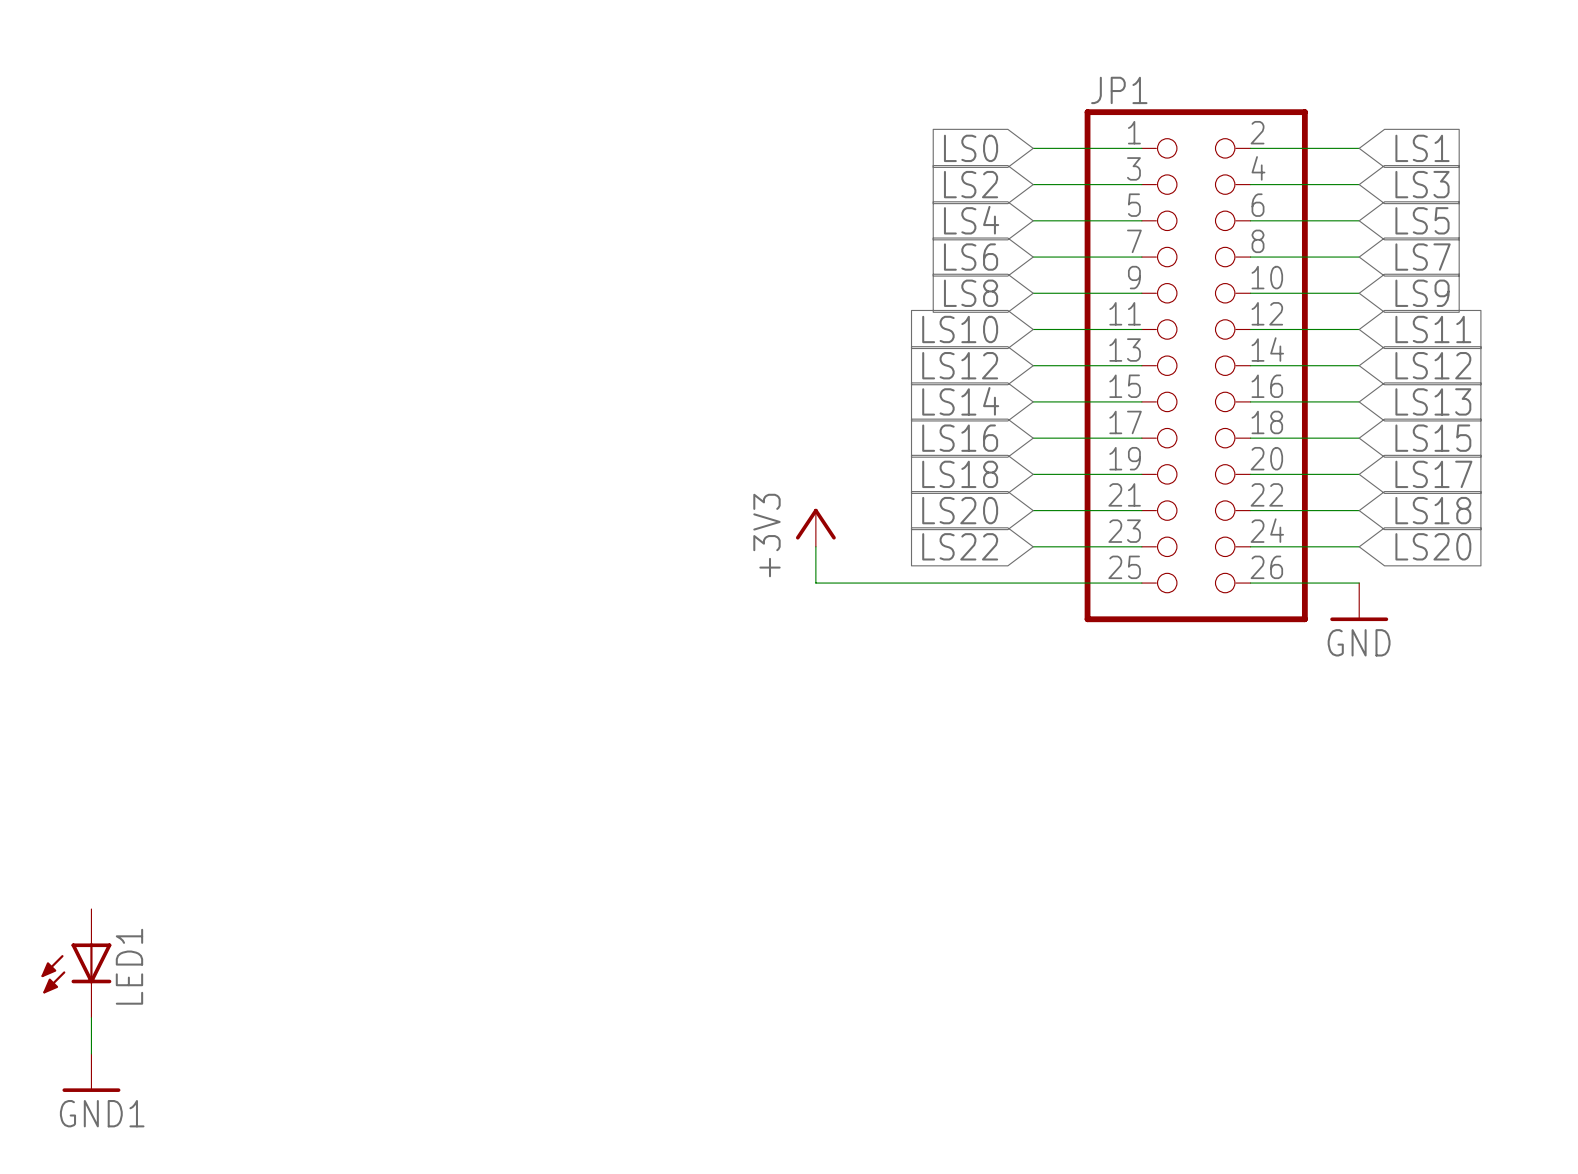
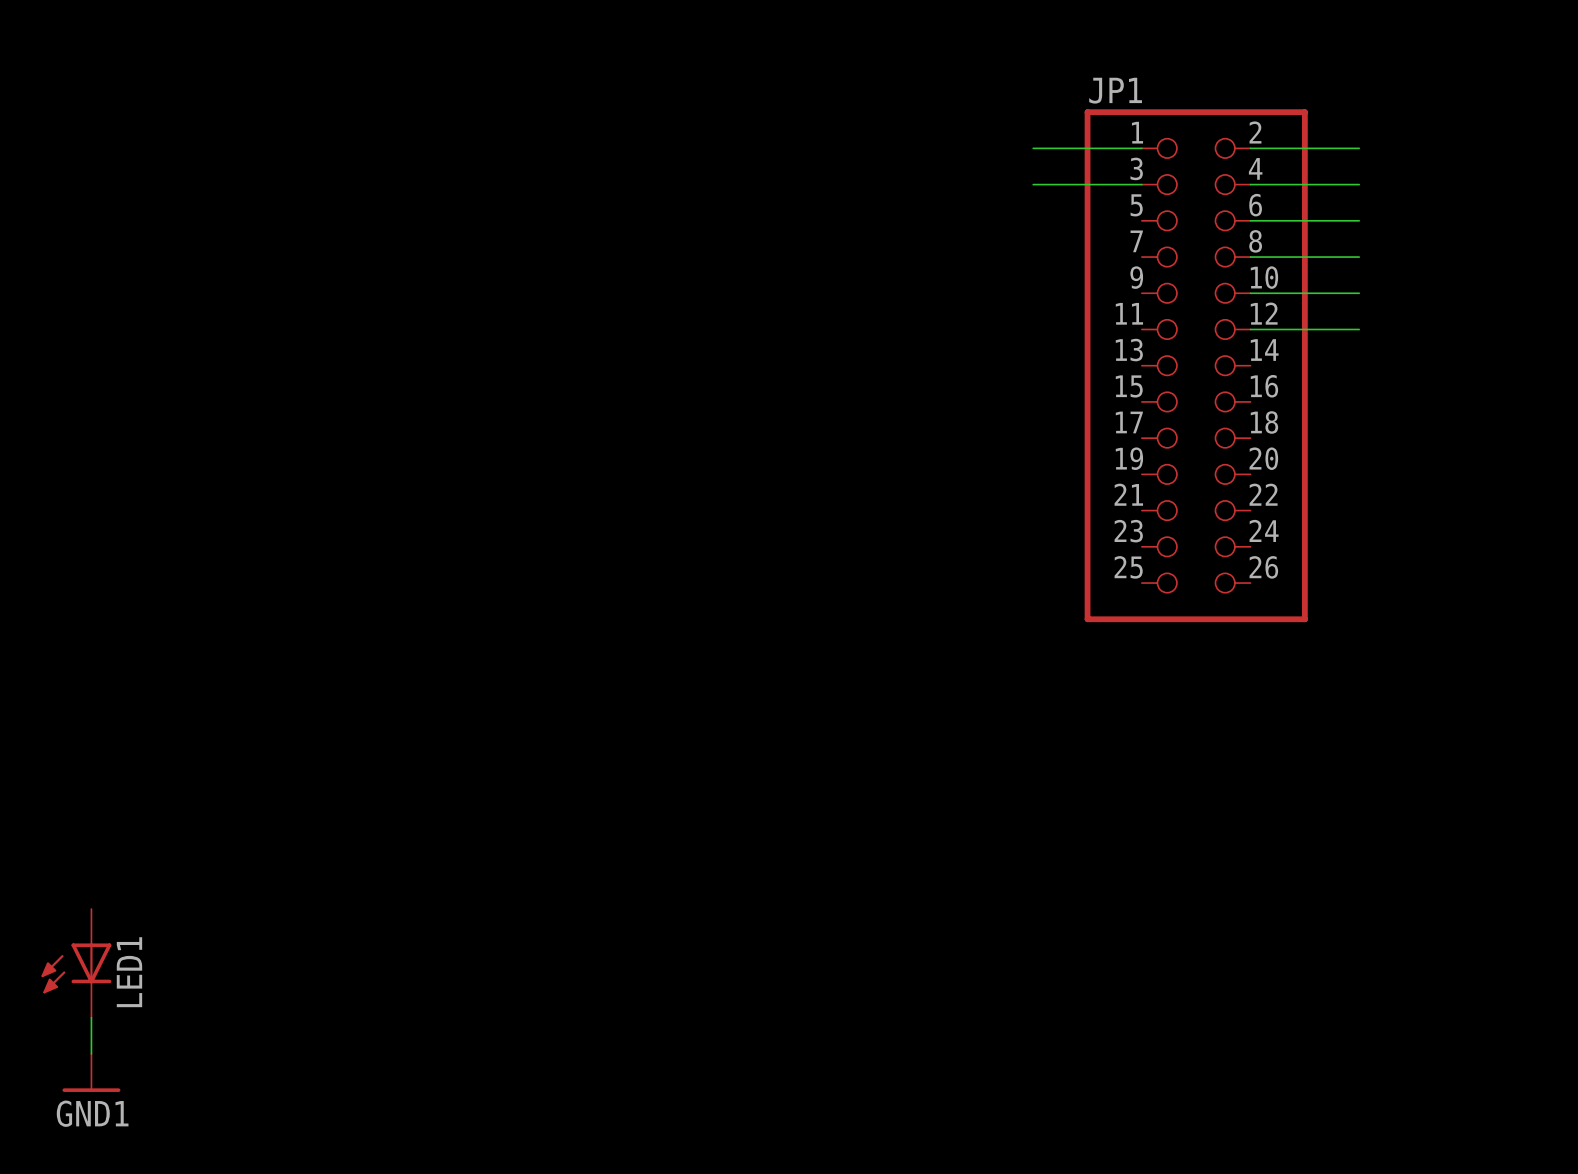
global label: LS0 (971, 148) -> none
global label: LS1 (1422, 148) -> none
global label: LS2 (971, 184) -> none
global label: LS3 (1422, 184) -> none
global label: LS4 (971, 220) -> none
wire: (1033, 220) (1141, 220) -> none
global label: LS5 (1422, 220) -> none
global label: LS6 (971, 257) -> none
wire: (1033, 257) (1141, 257) -> none
global label: LS7 (1423, 257) -> none
global label: LS8 (971, 293) -> none
wire: (1033, 293) (1141, 293) -> none
global label: LS9 (1422, 293) -> none
global label: LS10 (960, 329) -> none
wire: (1033, 329) (1141, 329) -> none
global label: LS11 (1433, 329) -> none
global label: LS12 (960, 365) -> none
wire: (1033, 365) (1141, 365) -> none
wire: (1250, 365) (1359, 365) -> none
global label: LS12 (1433, 365) -> none
global label: LS14 (960, 401) -> none
wire: (1033, 401) (1141, 401) -> none
wire: (1250, 401) (1359, 401) -> none
global label: LS13 (1433, 401) -> none
global label: LS16 (960, 438) -> none
wire: (1033, 438) (1141, 438) -> none
wire: (1250, 438) (1359, 438) -> none
global label: LS15 (1433, 438) -> none
global label: LS18 (960, 474) -> none
wire: (1033, 474) (1141, 474) -> none
wire: (1250, 474) (1359, 474) -> none
global label: LS17 (1433, 474) -> none
global label: LS20 (960, 510) -> none
wire: (1033, 510) (1141, 510) -> none
wire: (1250, 510) (1359, 510) -> none
global label: LS18 (1433, 510) -> none
power symbol: +3V3 (815, 527) -> none
wire: (815, 546) (815, 583) (1141, 583) -> none
global label: LS22 (960, 546) -> none
wire: (1033, 546) (1141, 546) -> none
wire: (1250, 546) (1359, 546) -> none
global label: LS20 (1433, 546) -> none
wire: (1250, 583) (1359, 583) -> none
power symbol: GND (1359, 602) -> none

